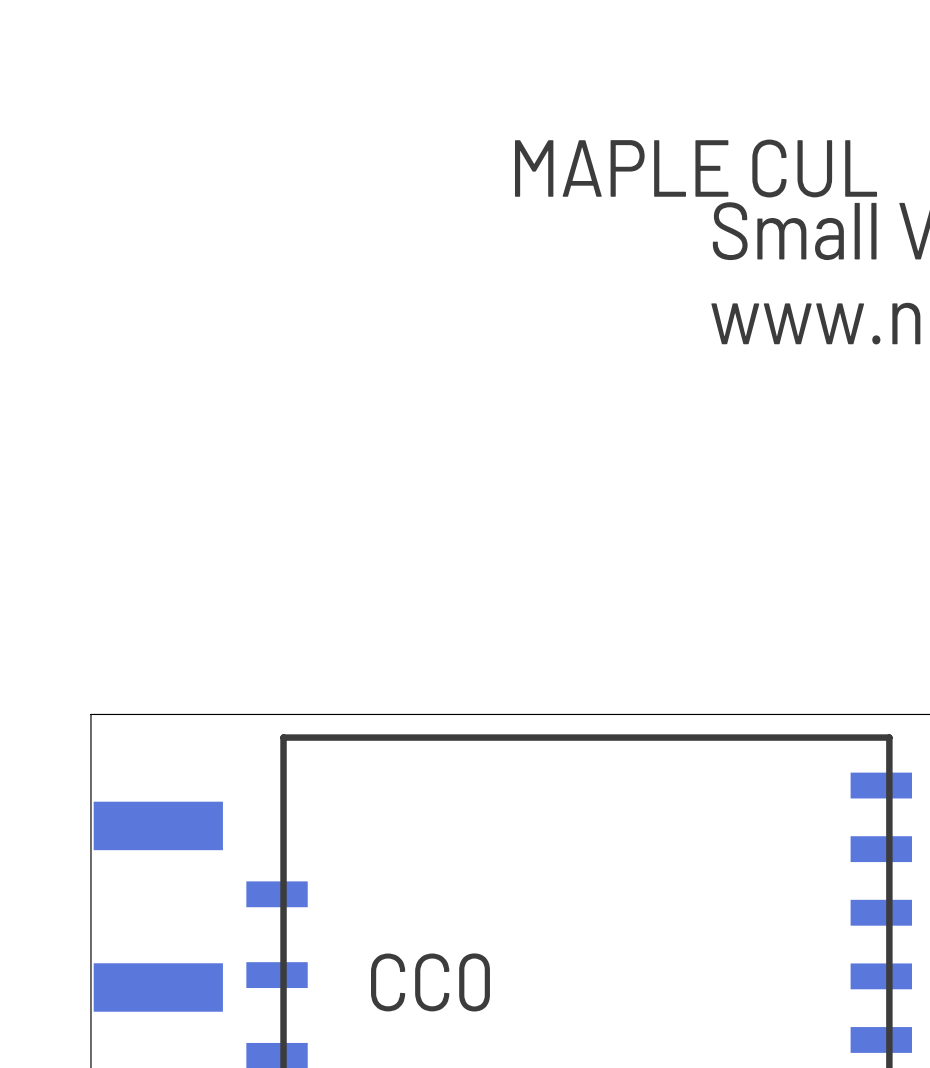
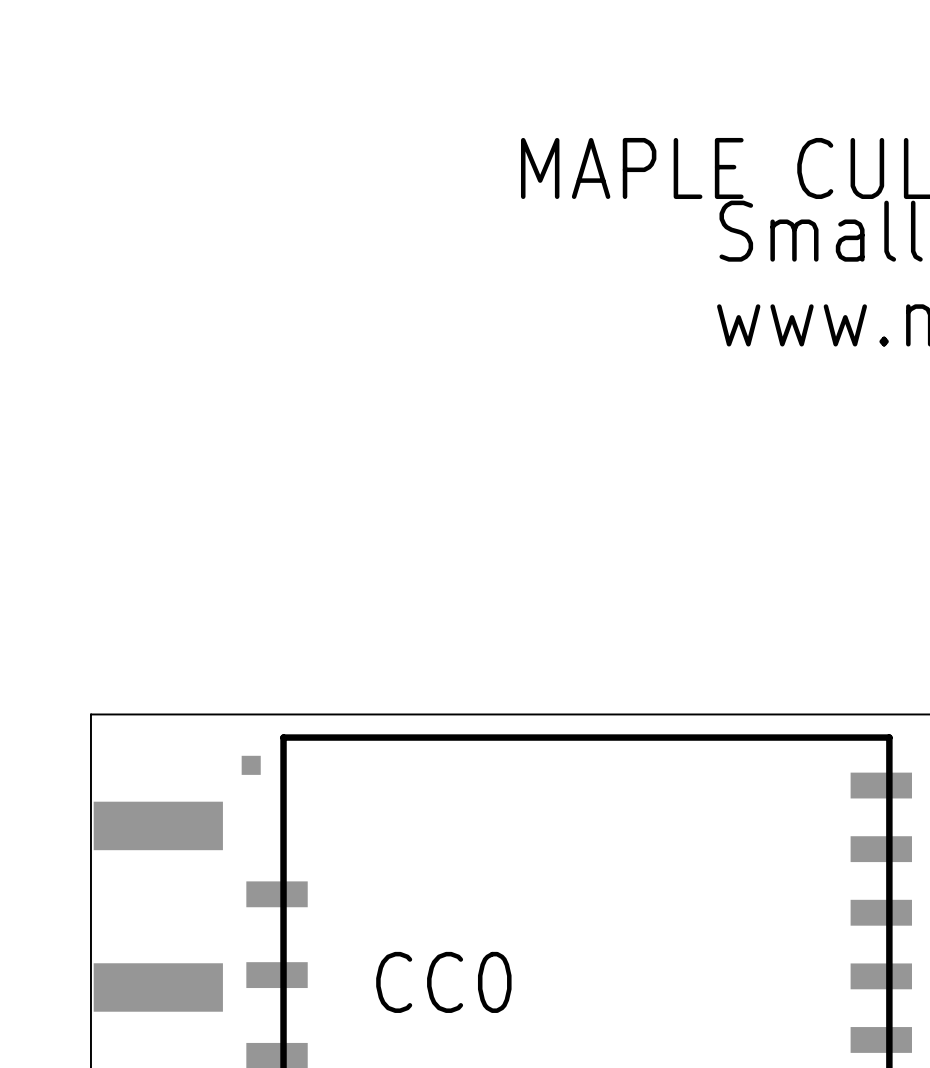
part: none -> (251, 765)

